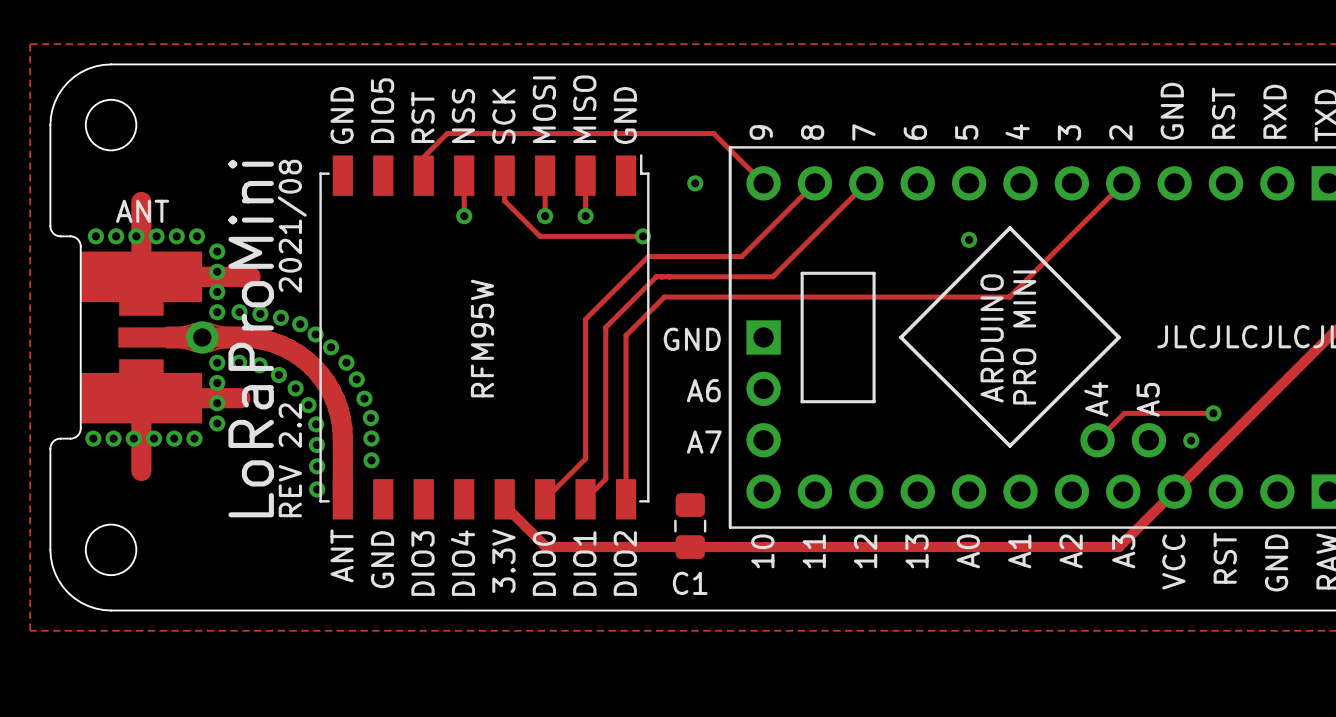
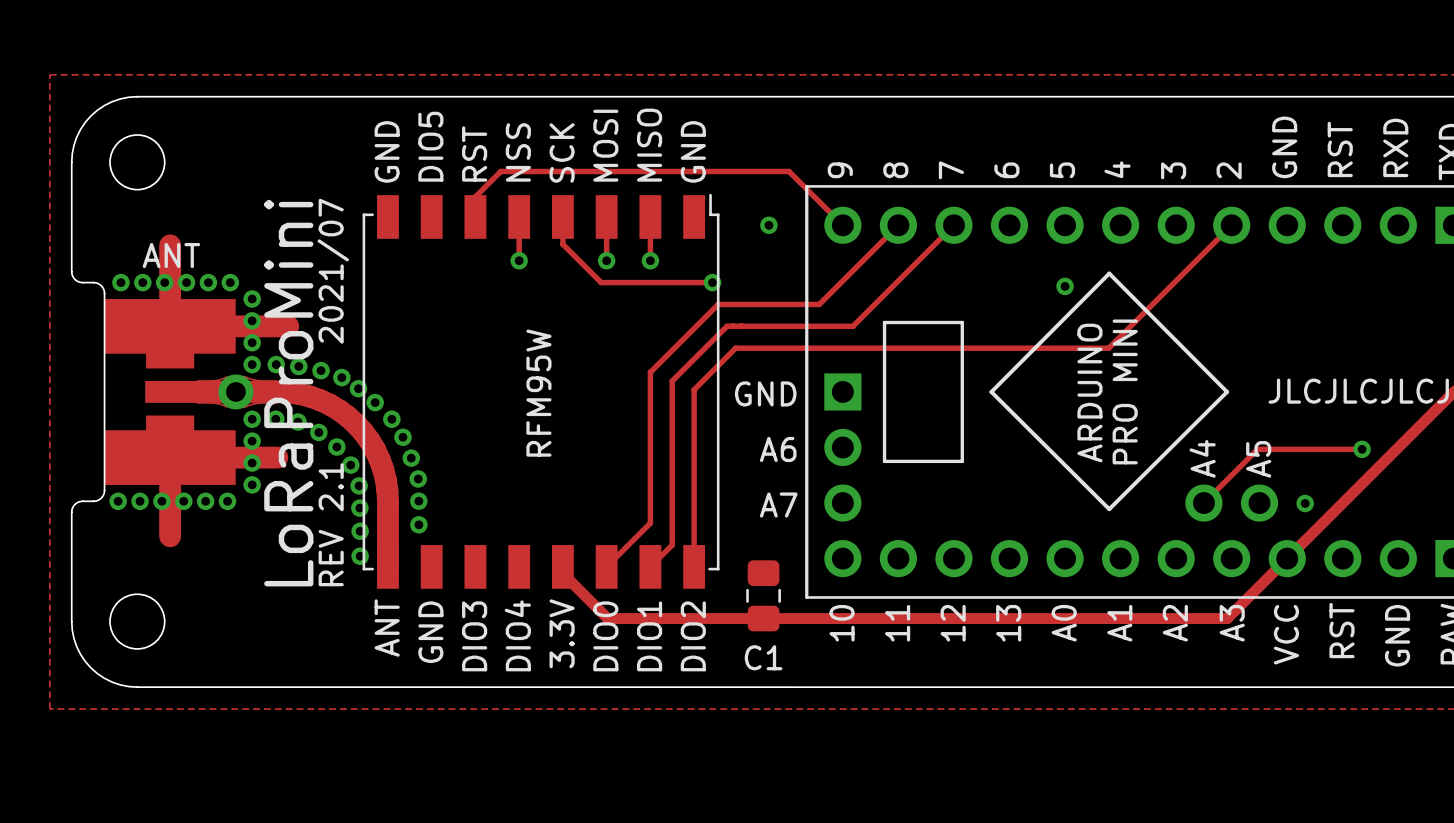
text: 2021/08 (292, 226) -> 2021/07 (333, 271)
track: (1124, 413) (1213, 413) -> (1233, 473) (1257, 449) (1362, 449)
via position: (1213, 413) -> (1362, 449)
text: REV 2.2 (290, 460) -> REV 2.1 (331, 524)

